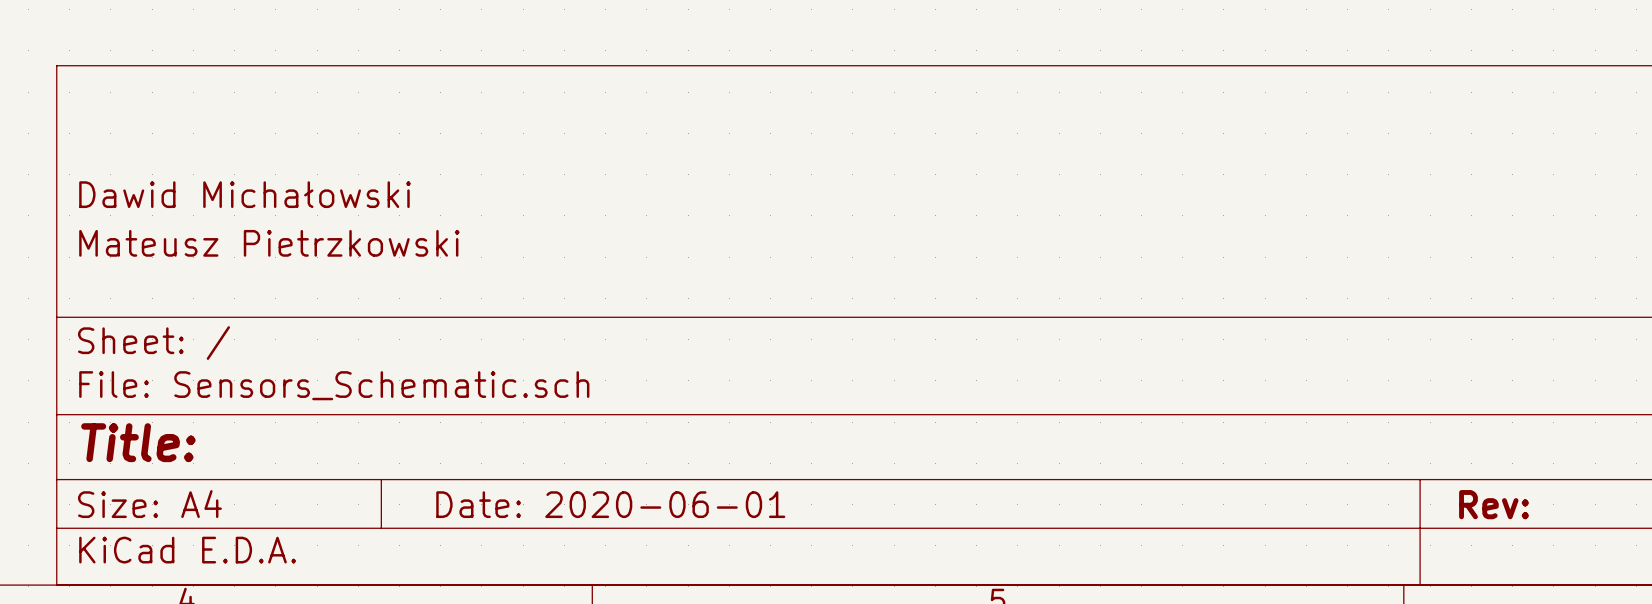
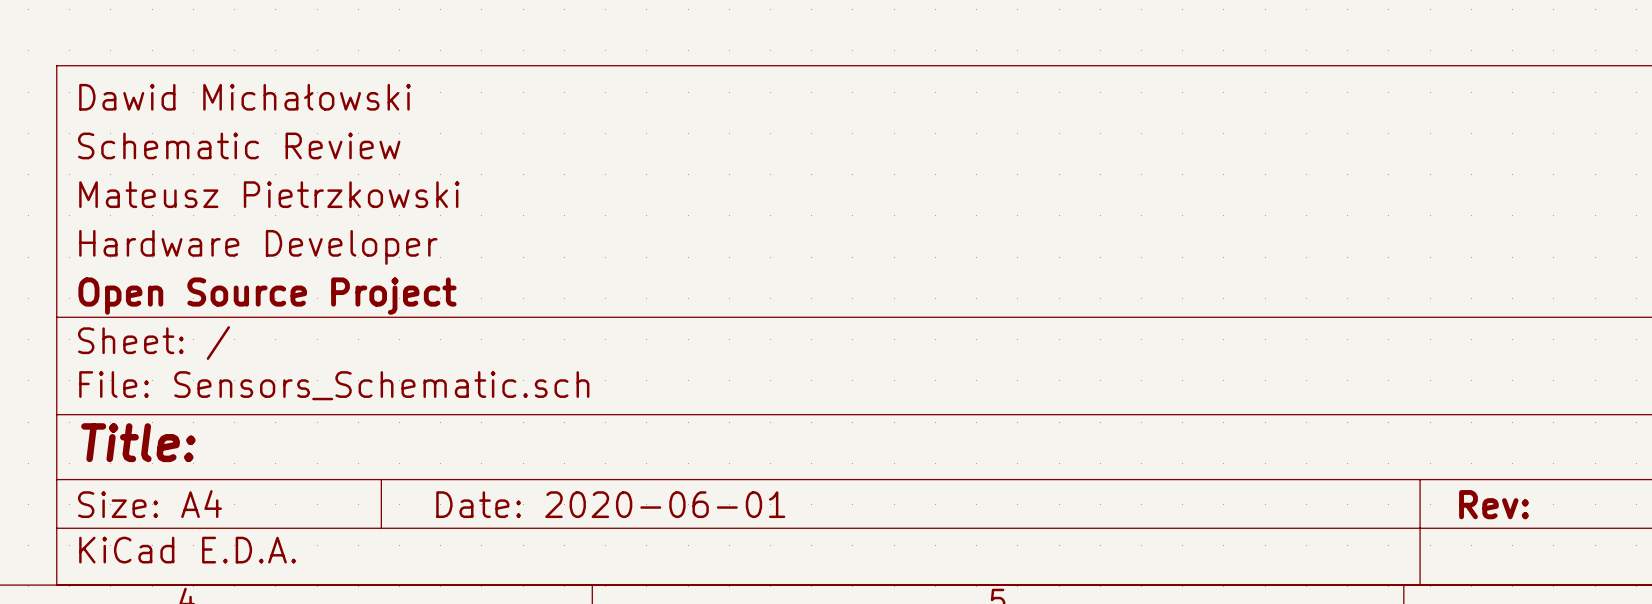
title block: none -> Dawid Michałowski (245, 97)
title block: none -> Schematic Review (239, 145)
title block: Dawid Michałowski (245, 194) -> Mateusz Pietrzkowski (269, 194)
title block: Mateusz Pietrzkowski (269, 243) -> Hardware Developer (258, 247)
title block: none -> Open Source Project (267, 296)

